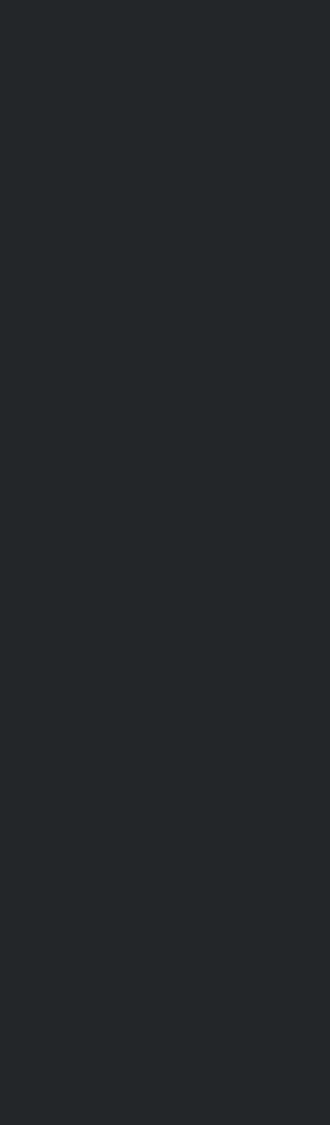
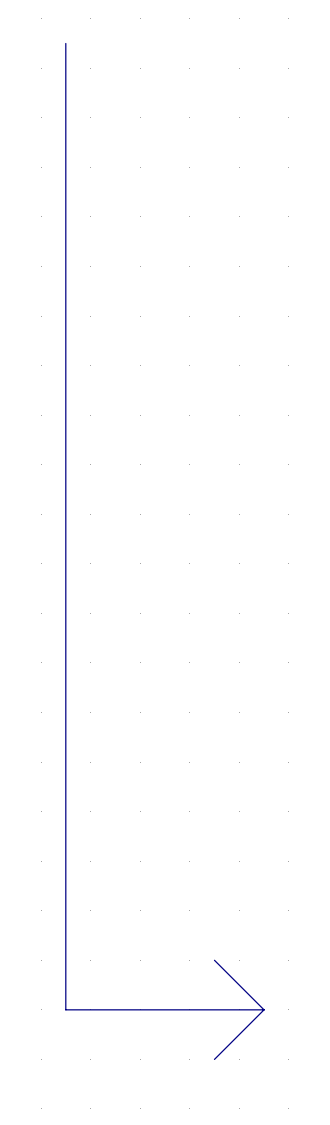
line: none -> (65, 43) (65, 1009) (264, 1009)
line: none -> (214, 960) (264, 1009)
line: none -> (264, 1009) (214, 1059)

